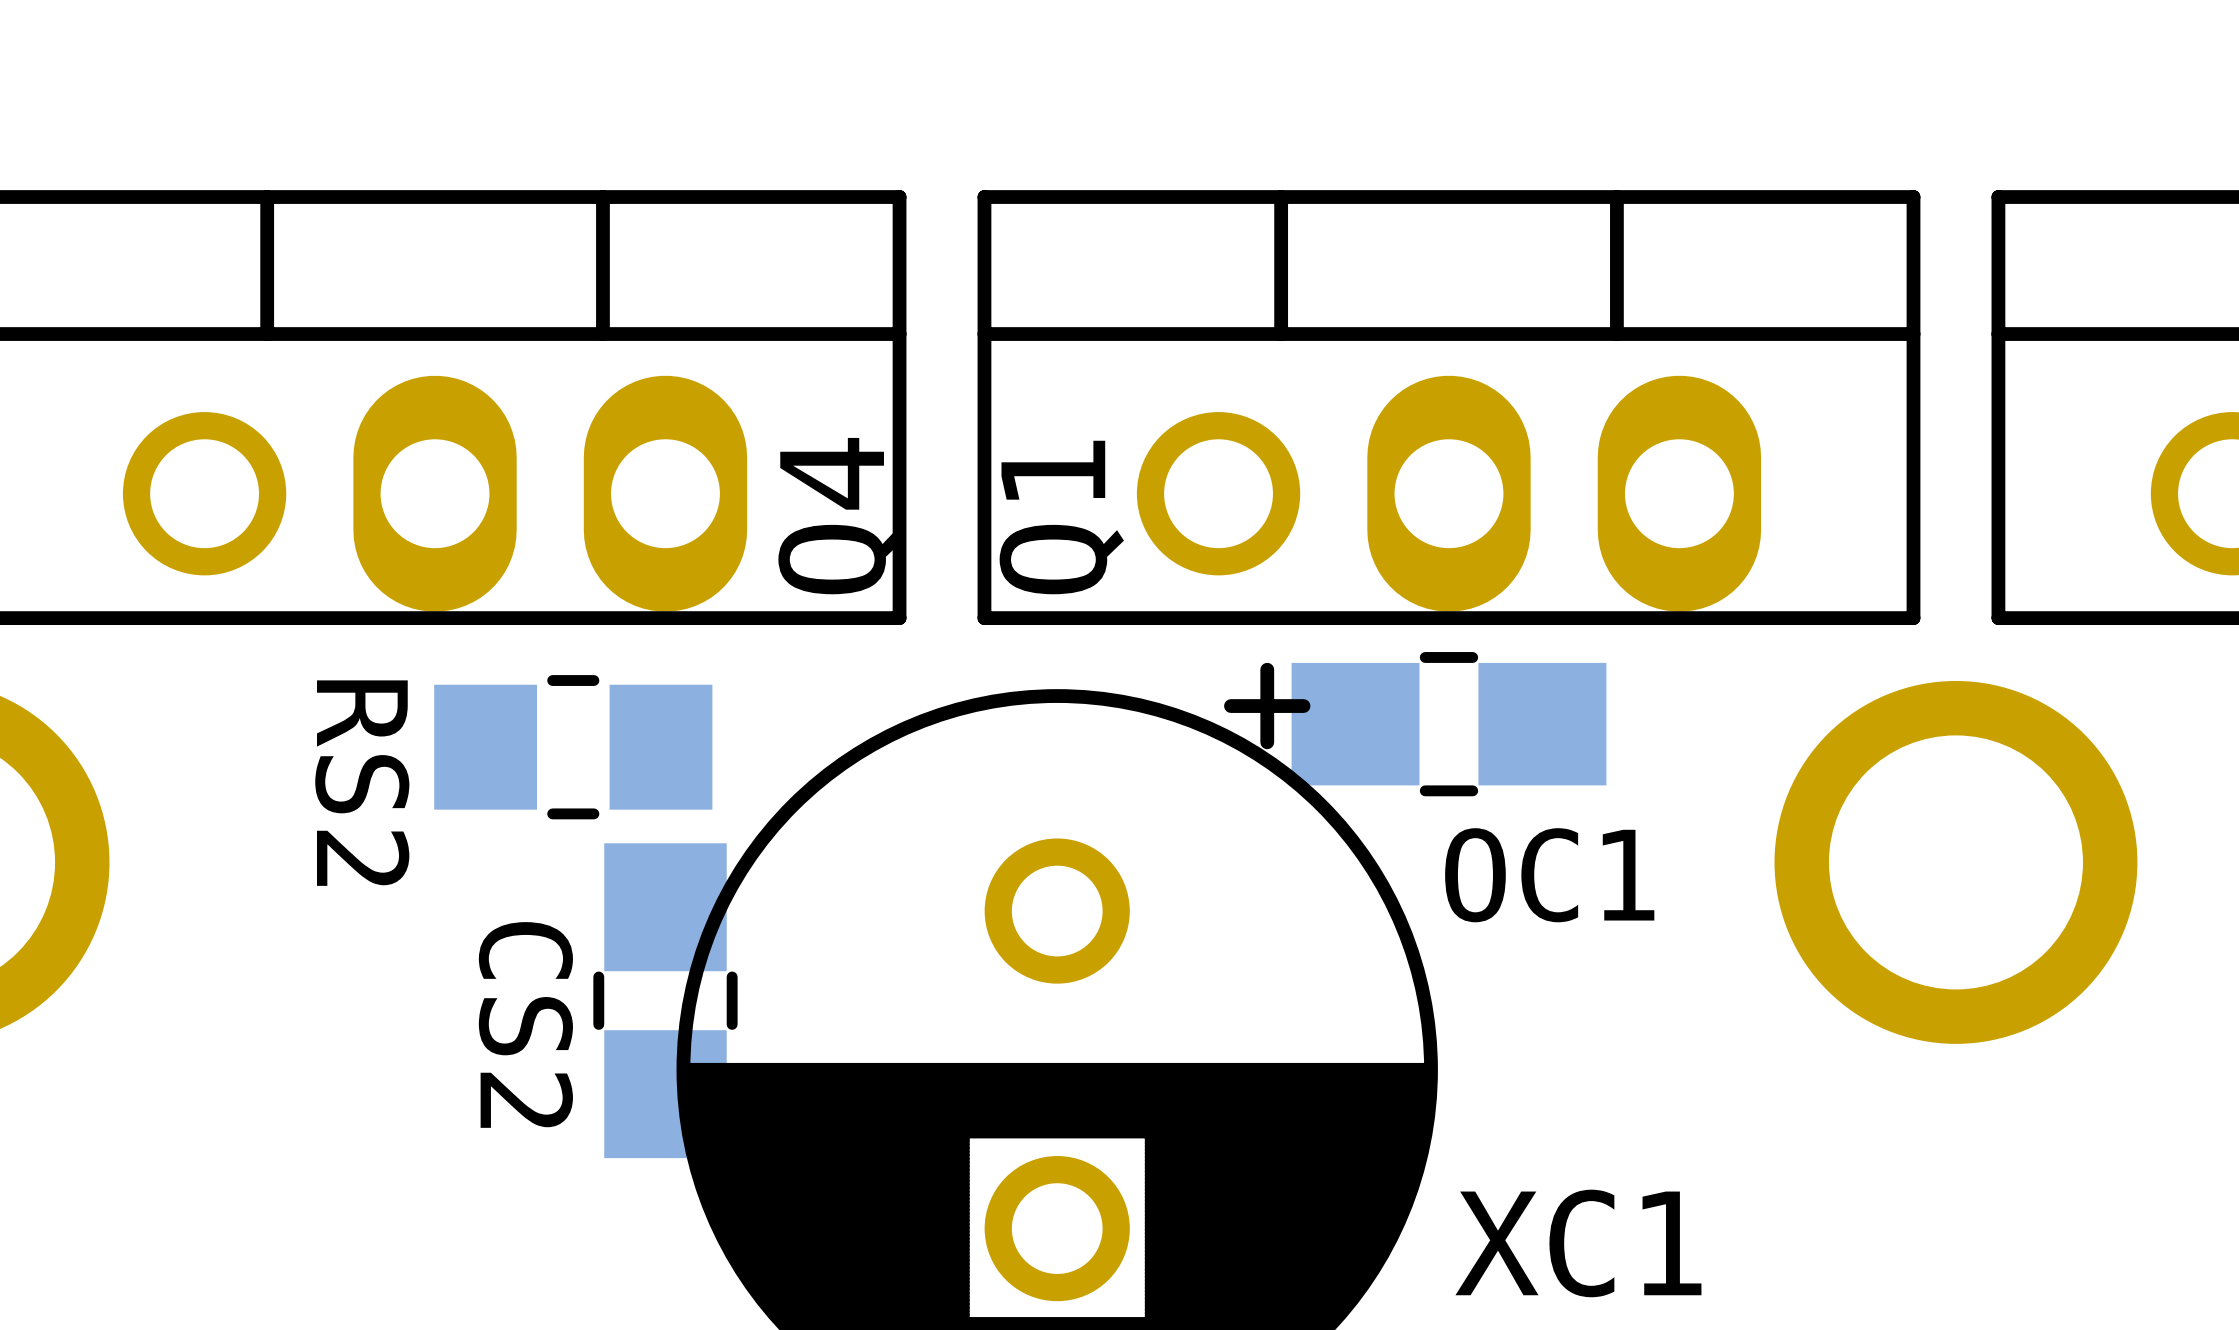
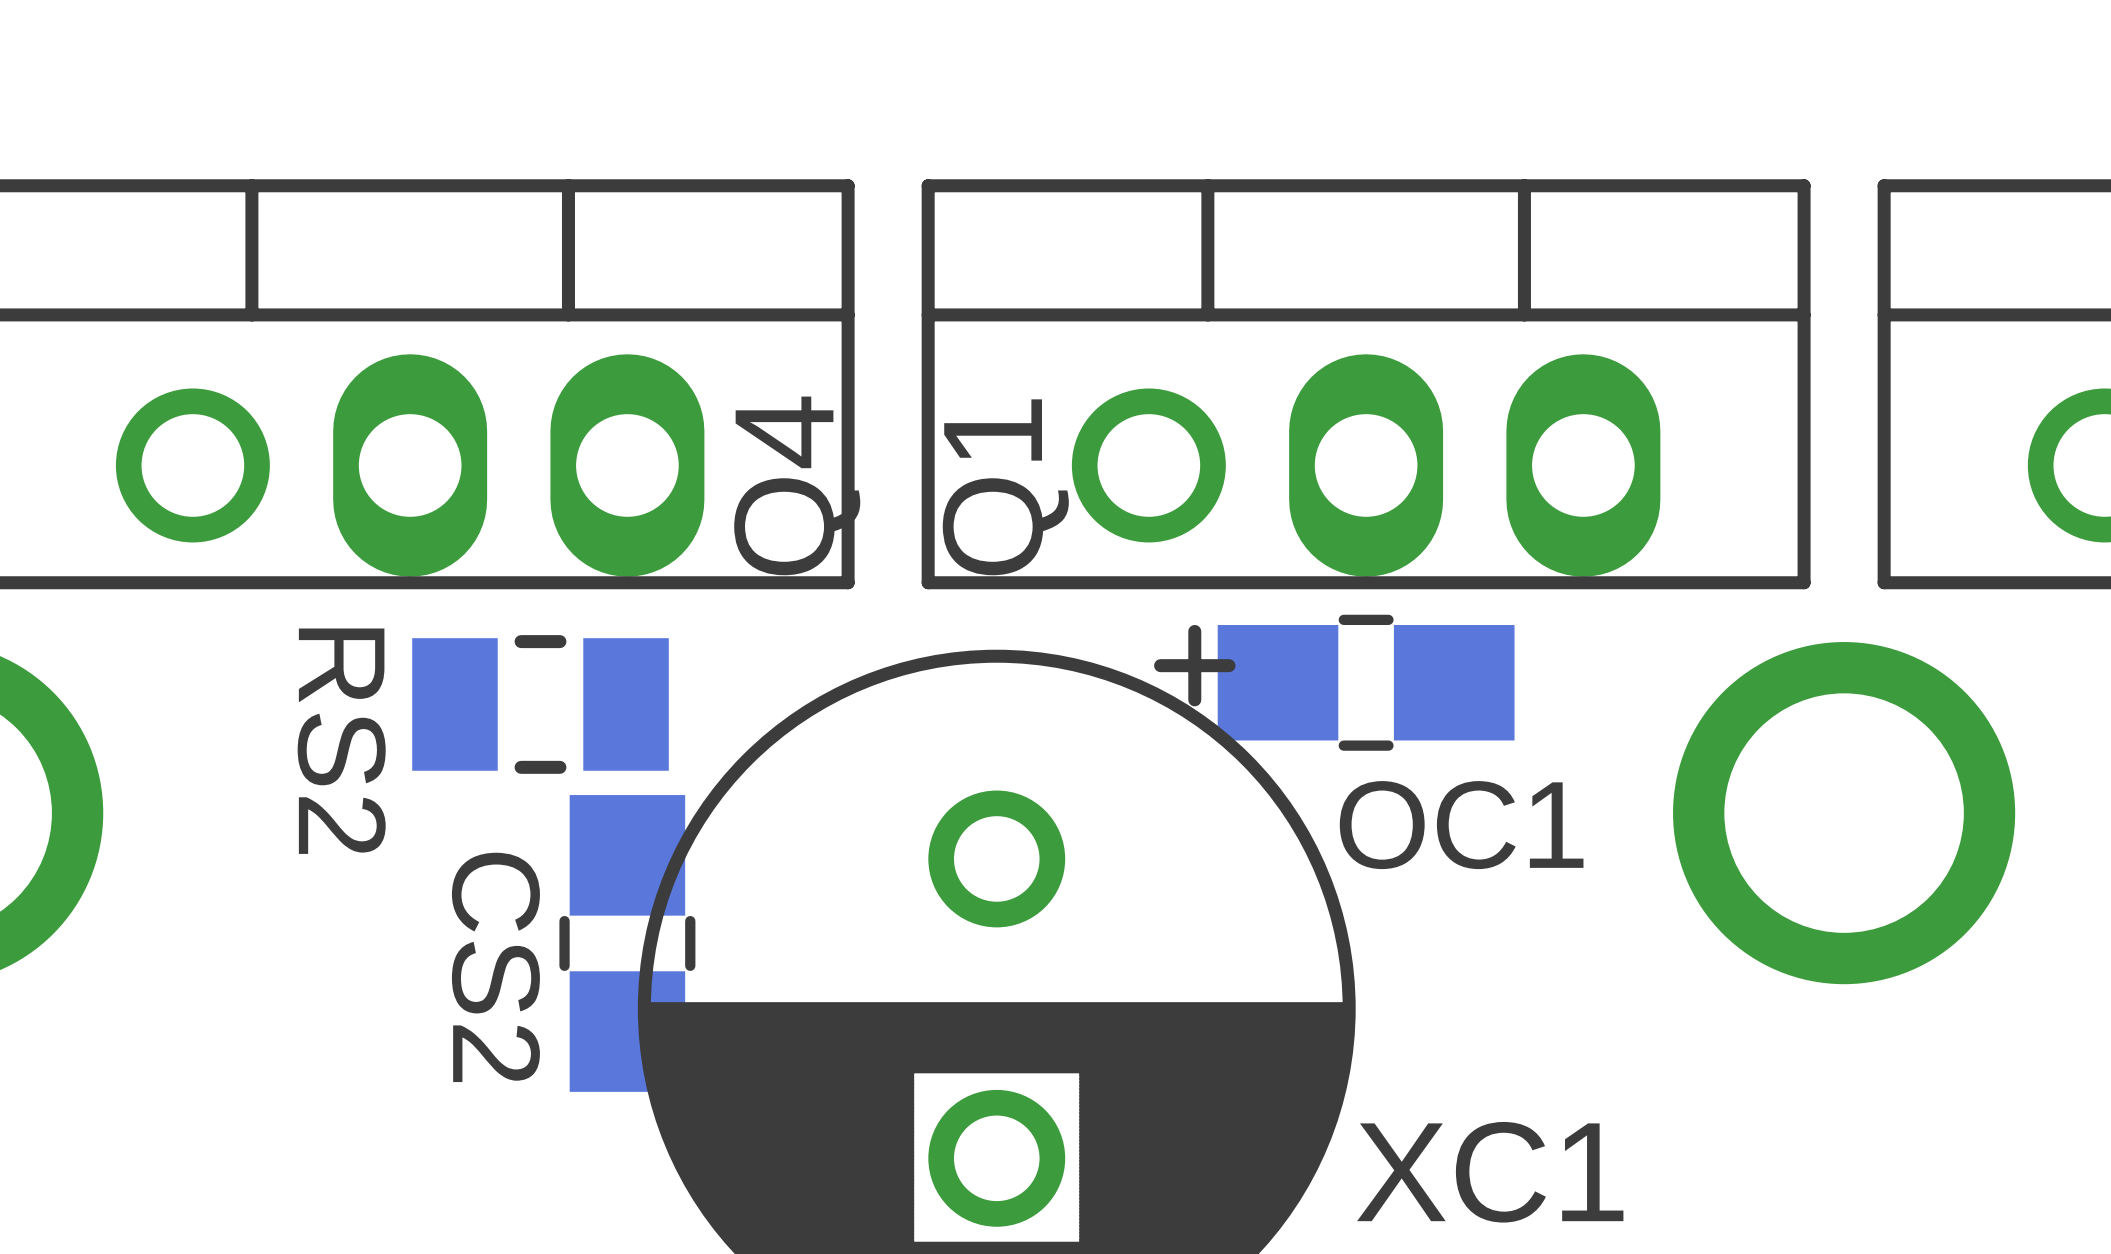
RS2 footprint: [434, 675, 713, 820] -> [412, 635, 669, 774]

